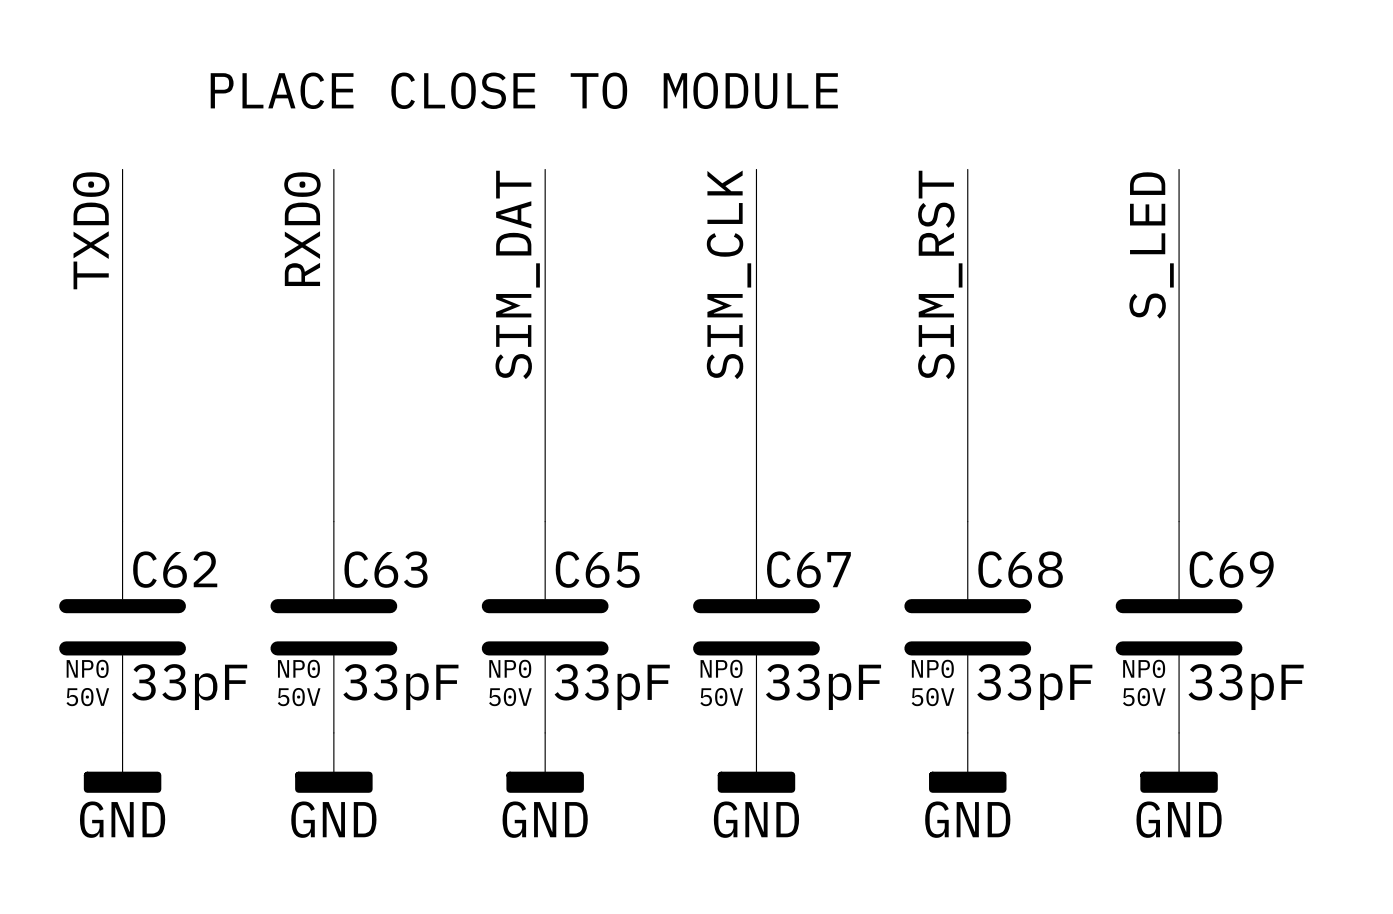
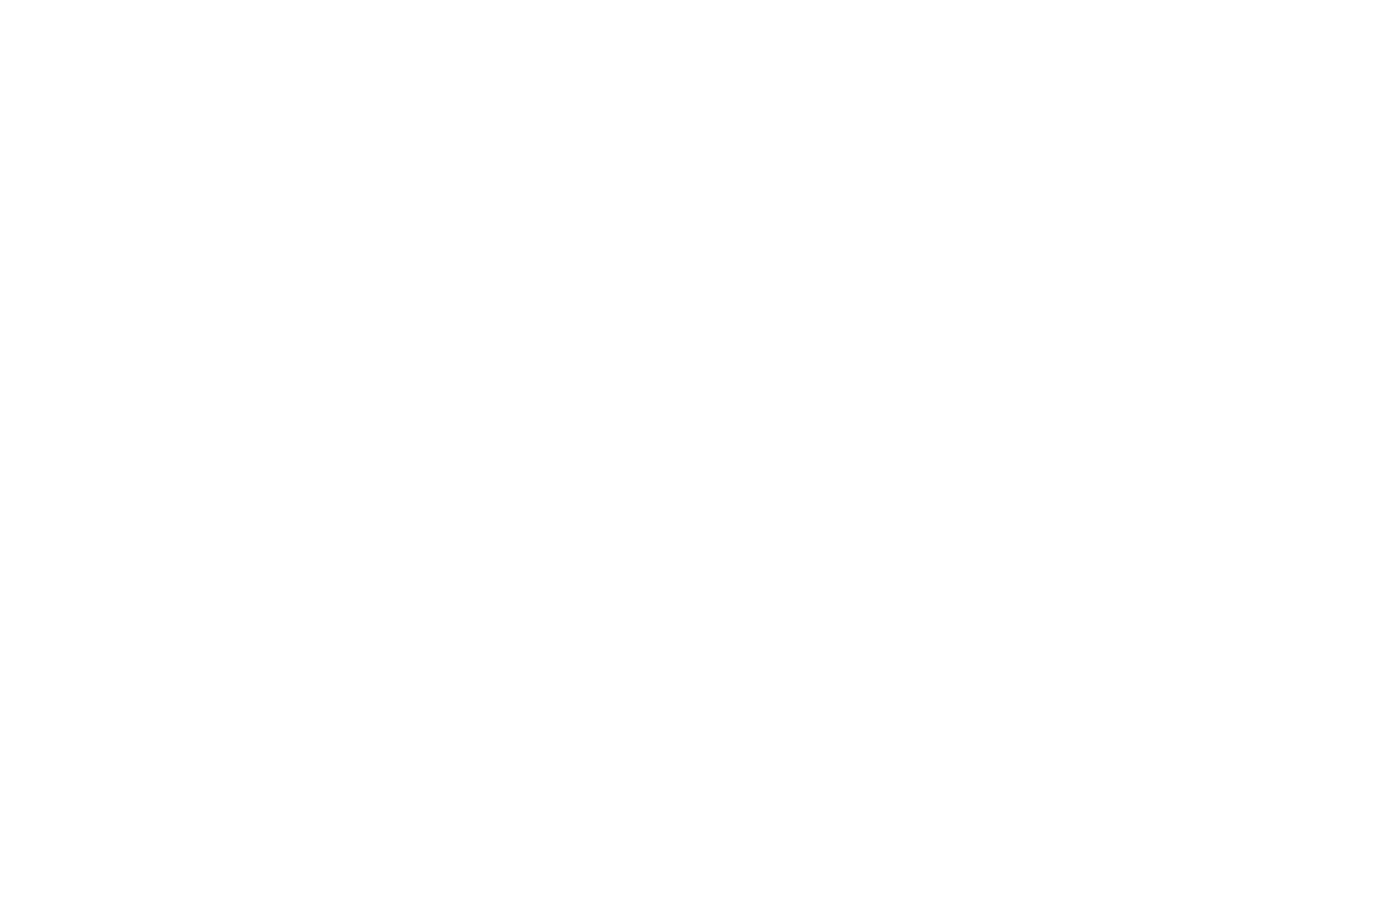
text: PLACE CLOSE TO MODULE (524, 90) -> none
wire: (122, 169) (122, 521) -> none
wire: (333, 169) (333, 521) -> none
wire: (545, 169) (545, 521) -> none
wire: (756, 169) (756, 521) -> none
wire: (967, 169) (967, 521) -> none
wire: (1179, 169) (1179, 521) -> none
label: RXD0 (302, 229) -> none
label: TXD0 (91, 230) -> none
label: S_LED (1151, 245) -> none
label: SIM_DAT (517, 274) -> none
label: SIM_CLK (728, 274) -> none
label: SIM_RST (940, 274) -> none
C62: 33pF (122, 627) -> none
C63: 33pF (333, 627) -> none
C65: 33pF (545, 627) -> none
C67: 33pF (756, 627) -> none
C68: 33pF (967, 627) -> none
C69: 33pF (1179, 627) -> none
power symbol: GND (122, 762) -> none
power symbol: GND (333, 762) -> none
power symbol: GND (545, 762) -> none
power symbol: GND (756, 762) -> none
power symbol: GND (967, 762) -> none
power symbol: GND (1179, 762) -> none

